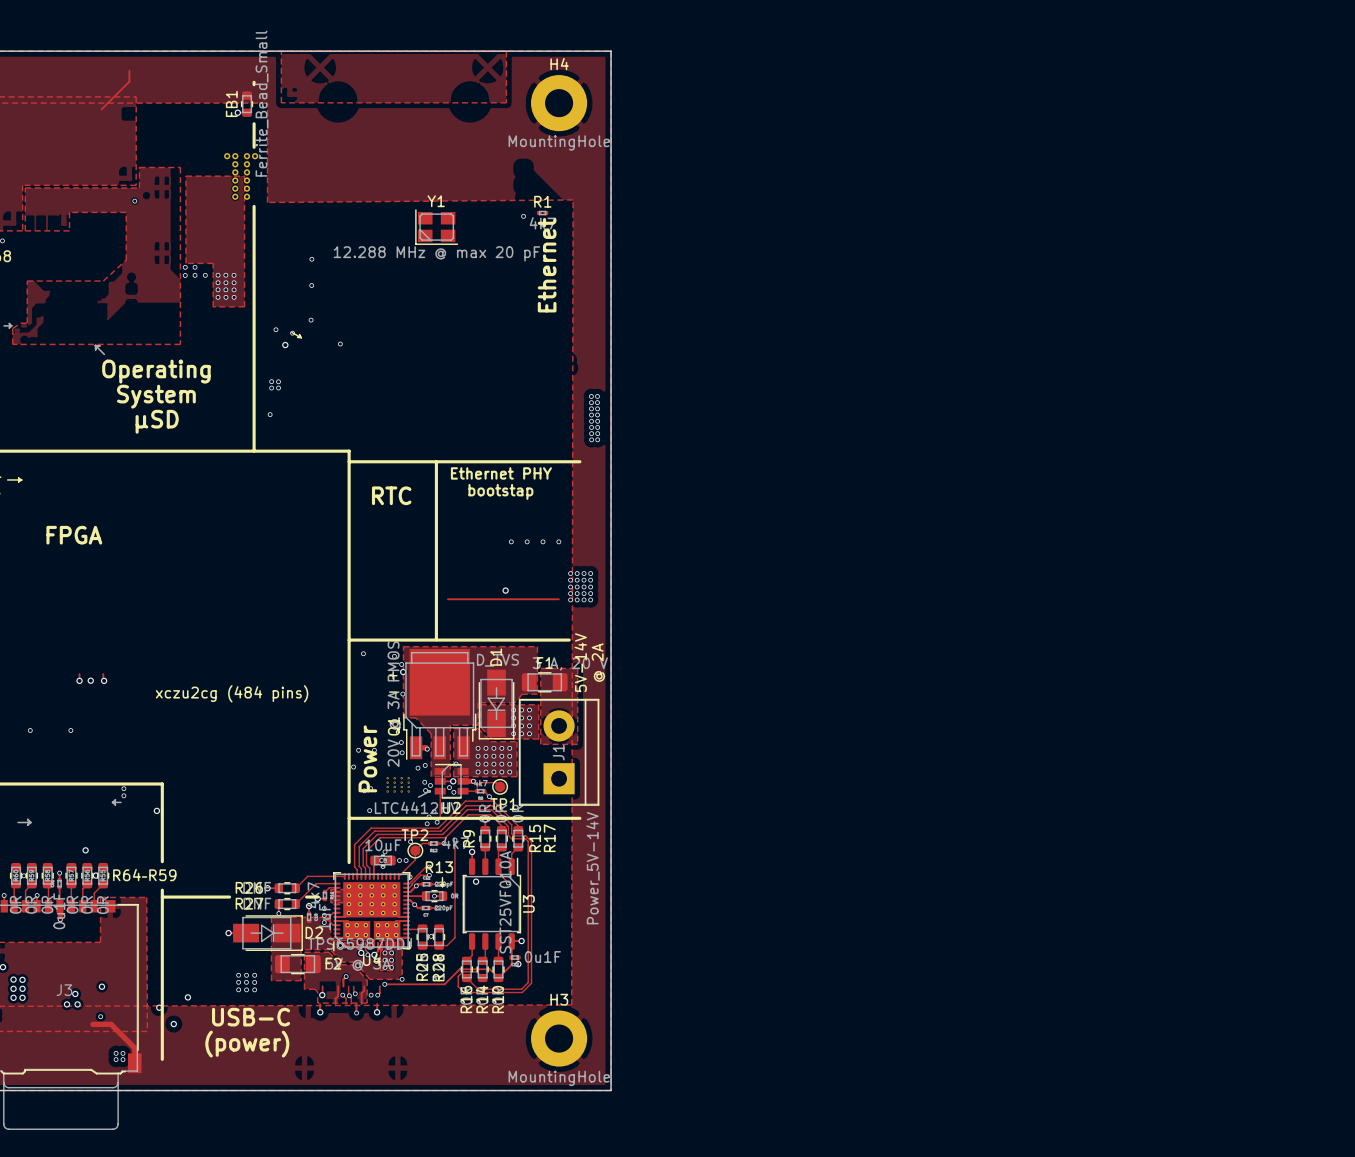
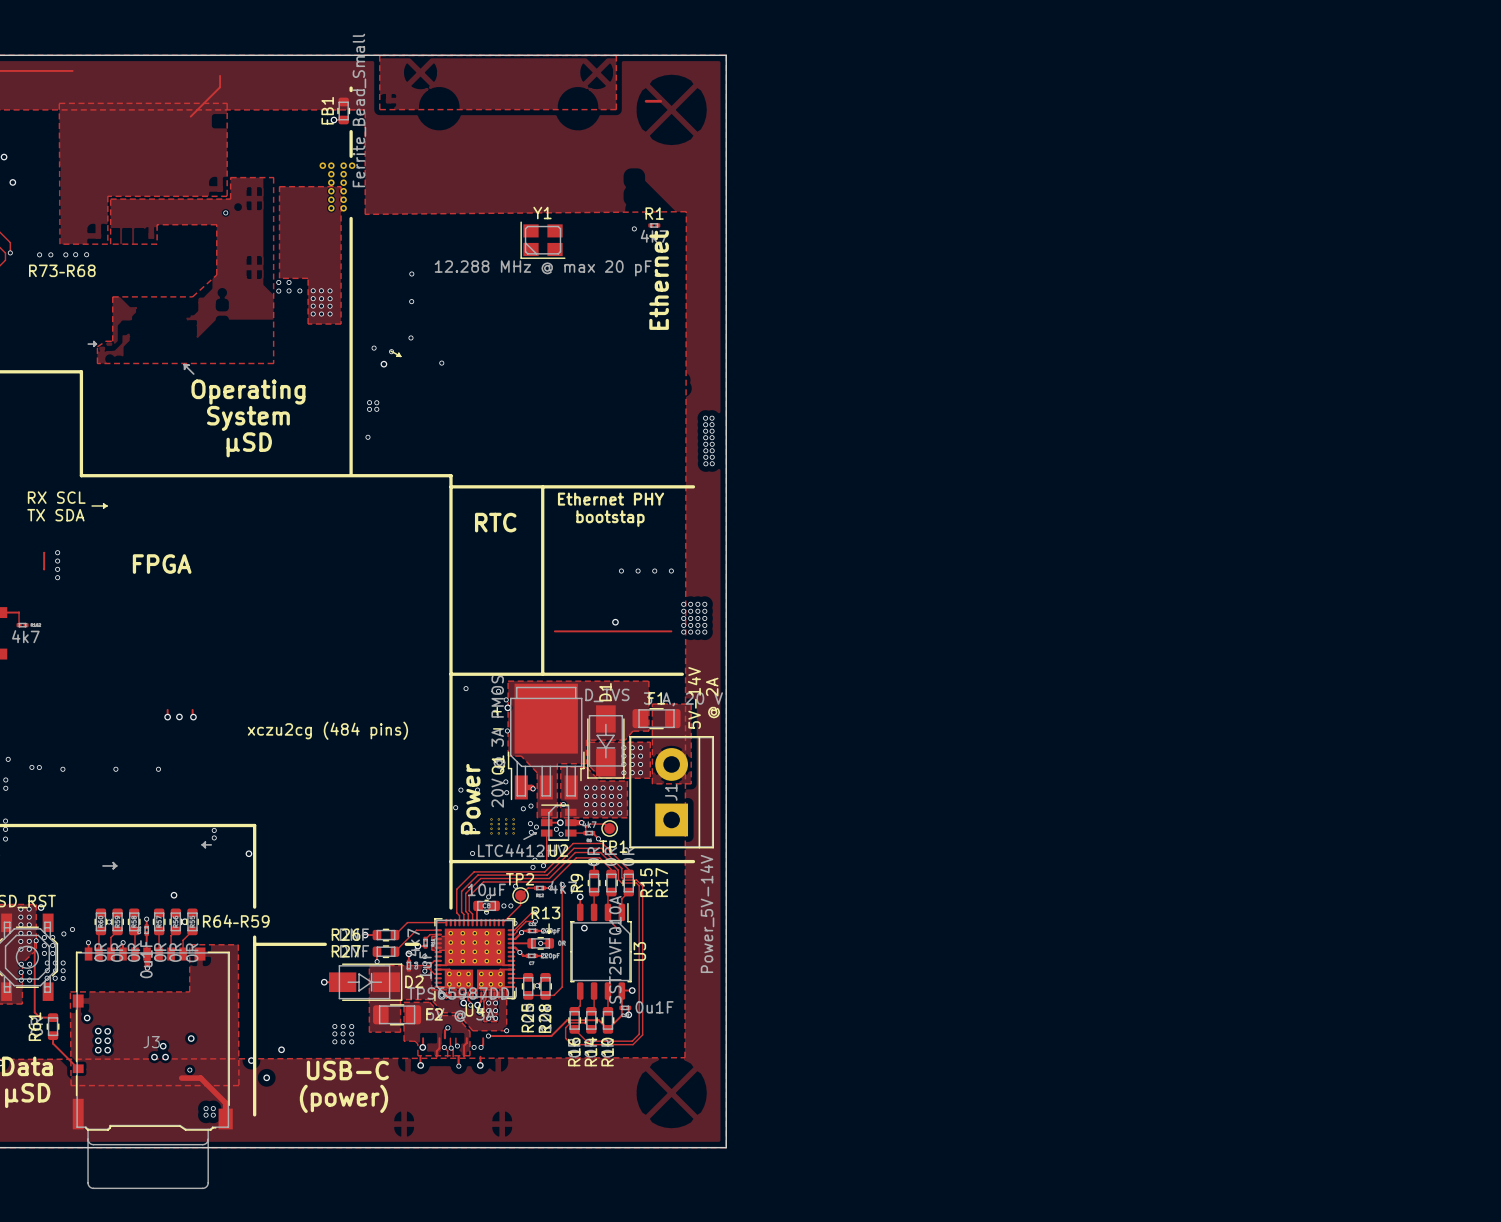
H4: MountingHole (559, 103) -> none
H3: MountingHole (559, 1038) -> none

